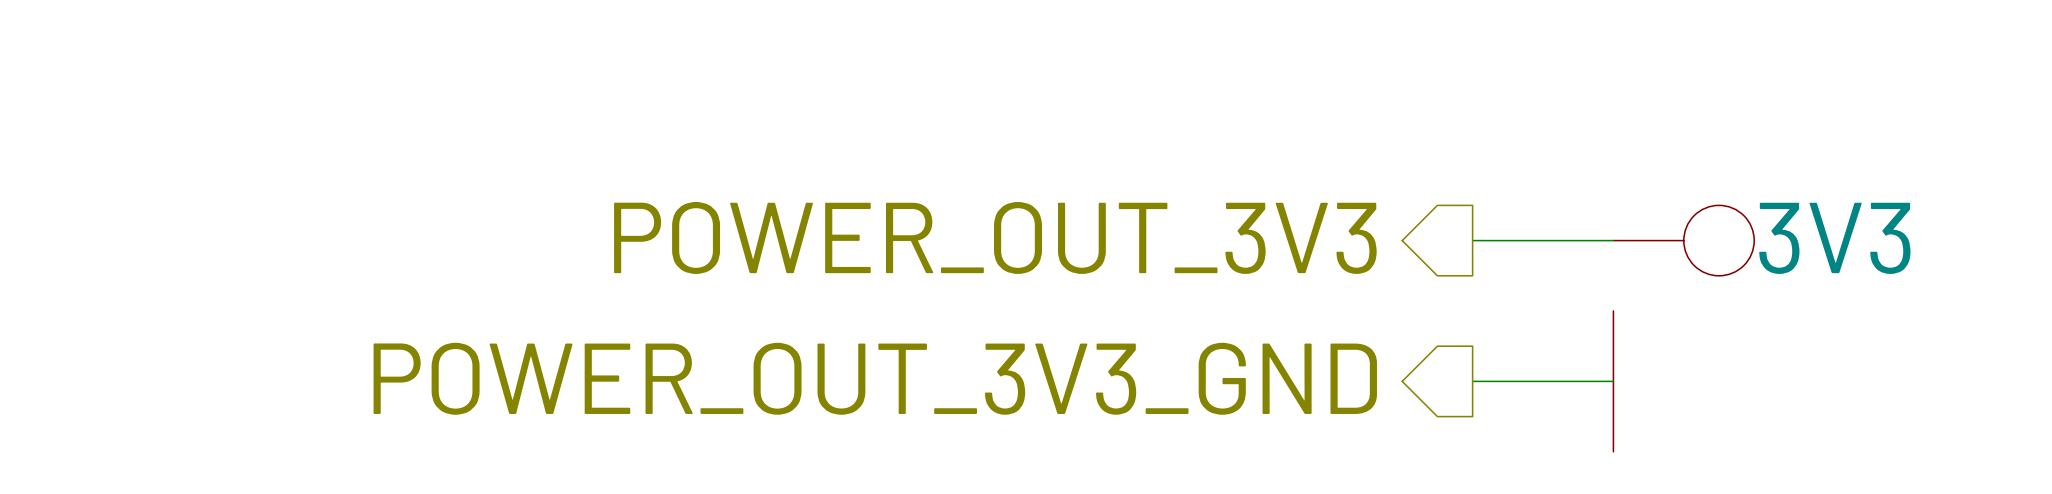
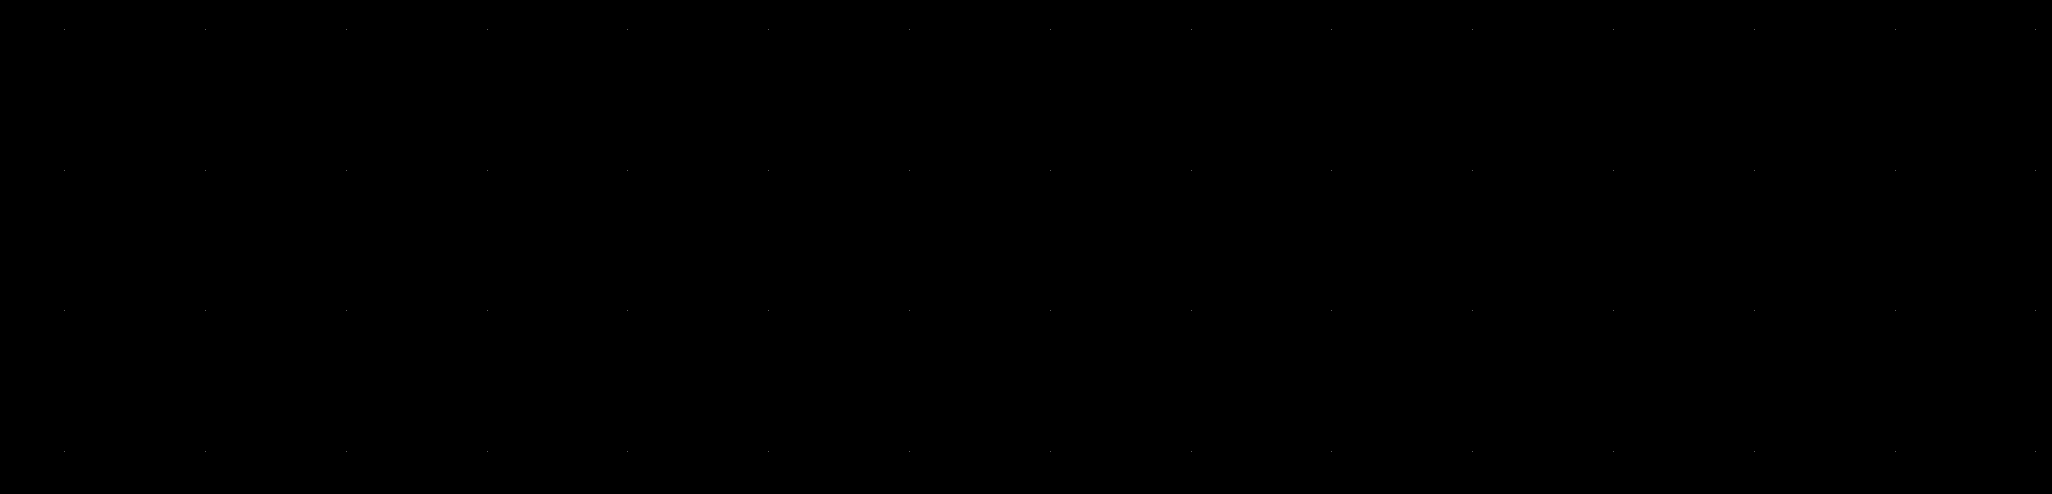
hierarchical label: POWER_OUT_3V3 (995, 237) -> none
wire: (1472, 240) (1613, 240) -> none
power symbol: 3V3 (1683, 240) -> none
hierarchical label: POWER_OUT_3V3_GND (875, 378) -> none
wire: (1472, 381) (1613, 381) -> none
power symbol: (1613, 381) -> none

